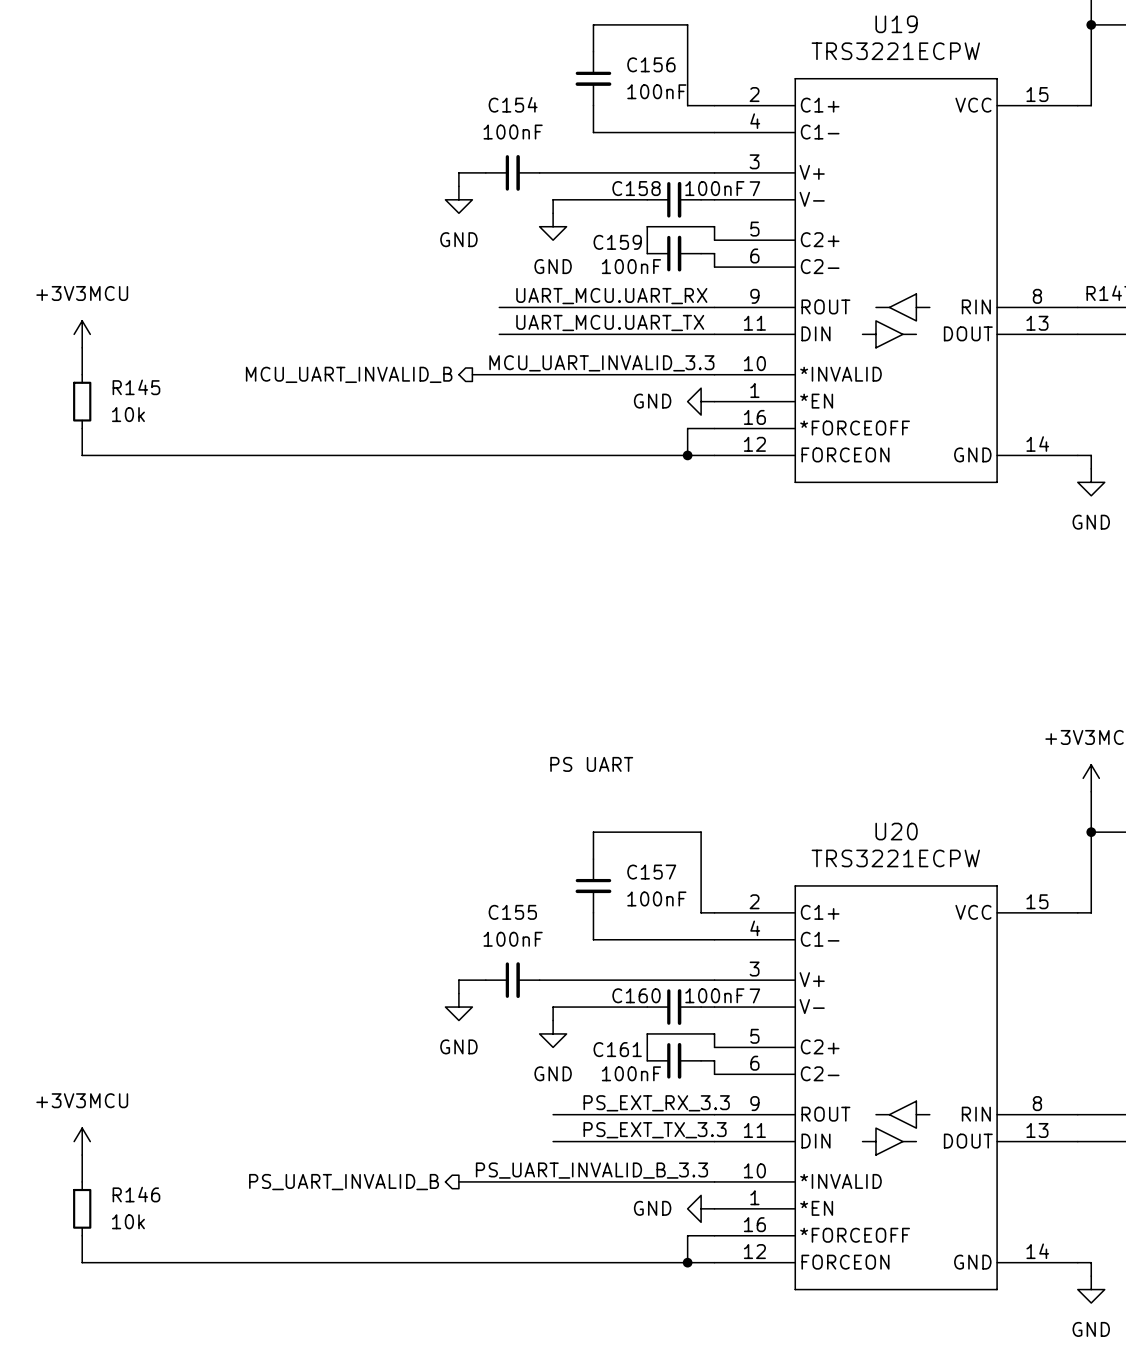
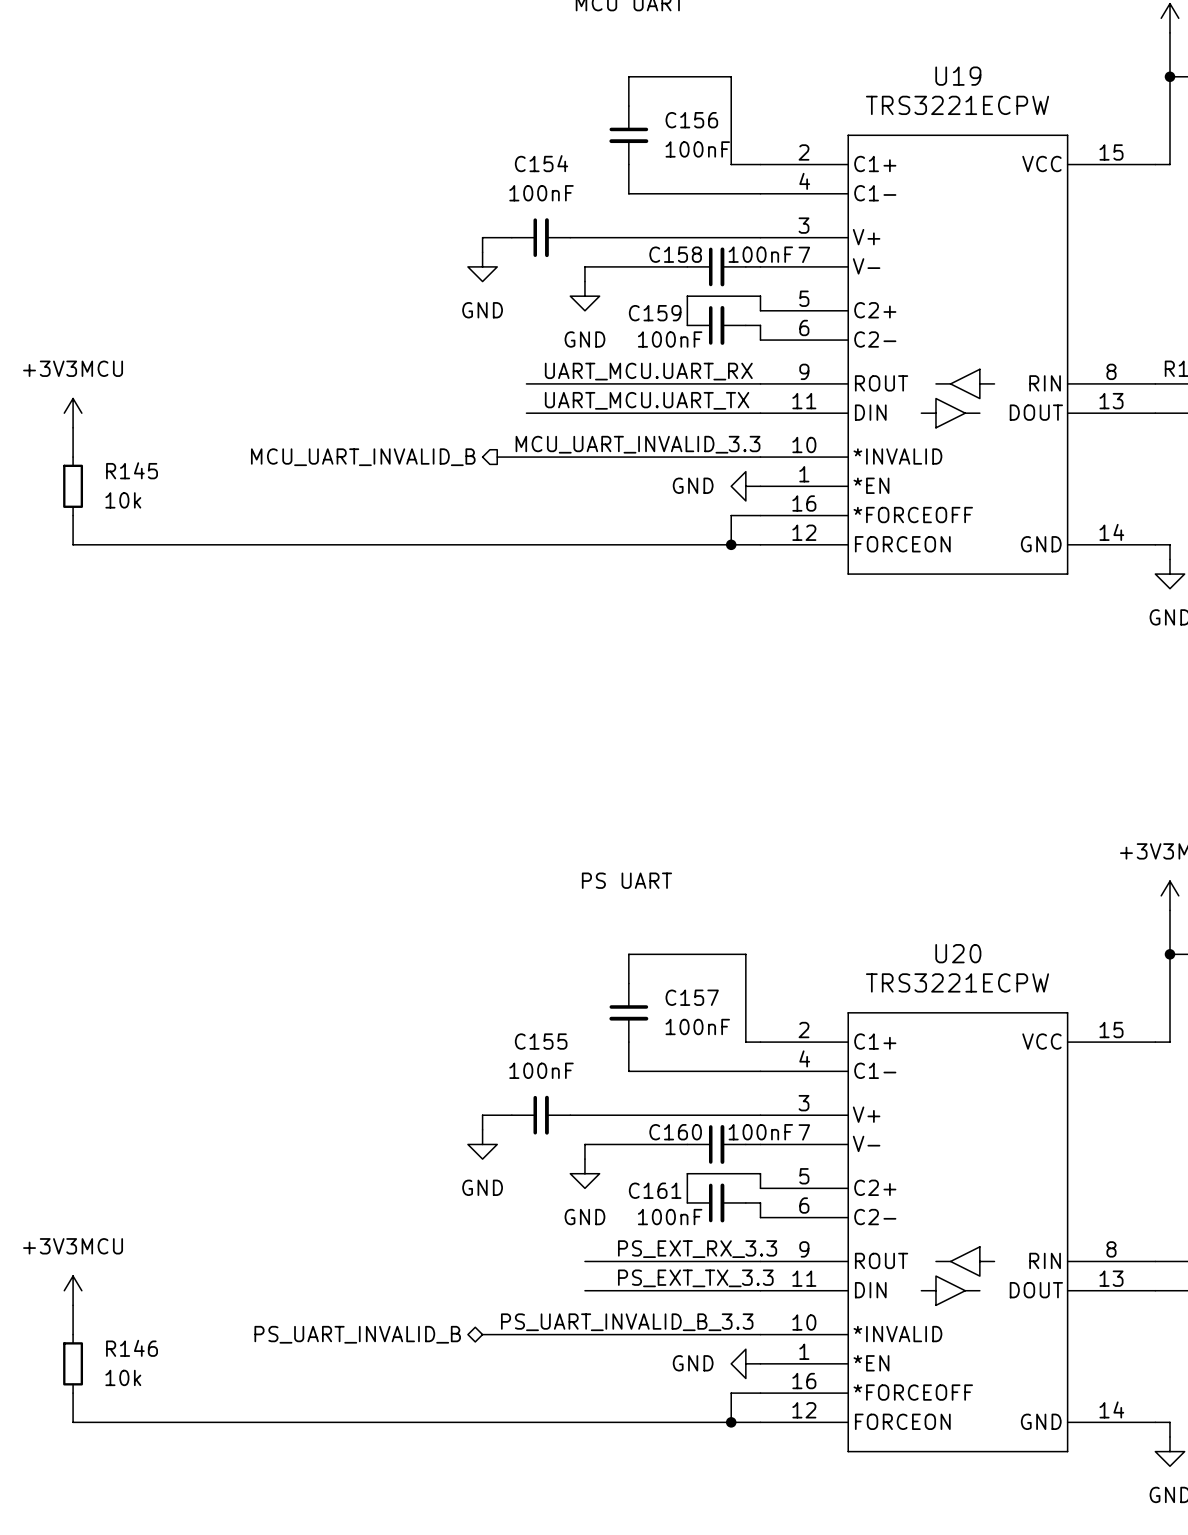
hierarchical label shape: output (344, 1182) -> bidirectional (357, 1334)

